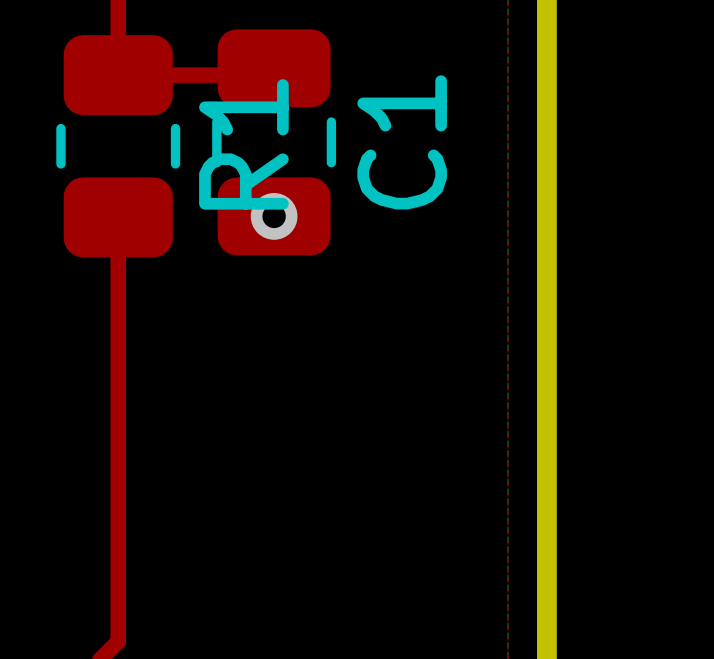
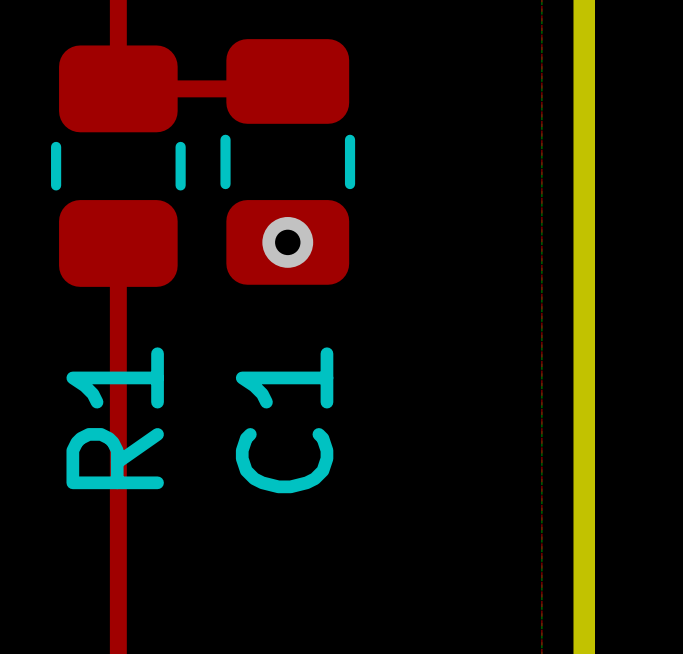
C1 name position: C1 (402, 142) -> C1 (284, 420)
R1 name position: R1 (243, 144) -> R1 (115, 418)

